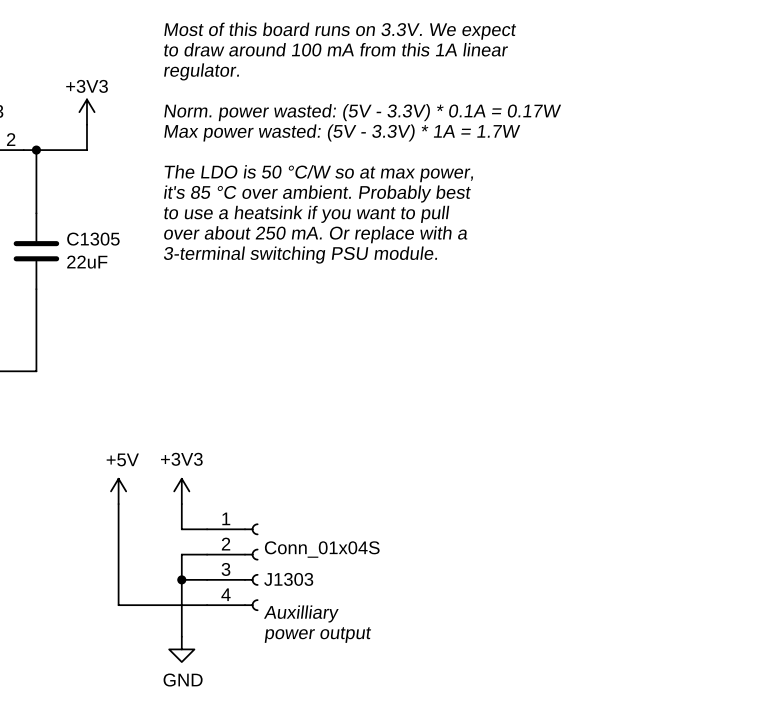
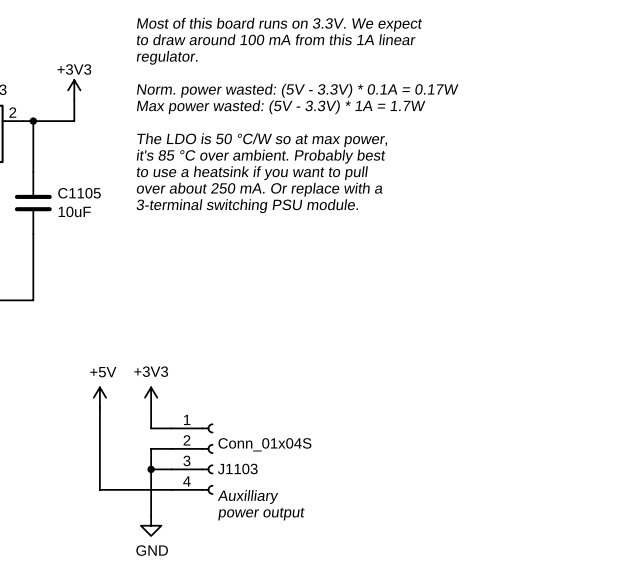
C1305 name: C1305 (93, 239) -> C1105 (79, 193)
C1305 value: 22uF (87, 262) -> 10uF (74, 211)
J1303 name: J1303 (288, 579) -> J1103 (237, 469)

